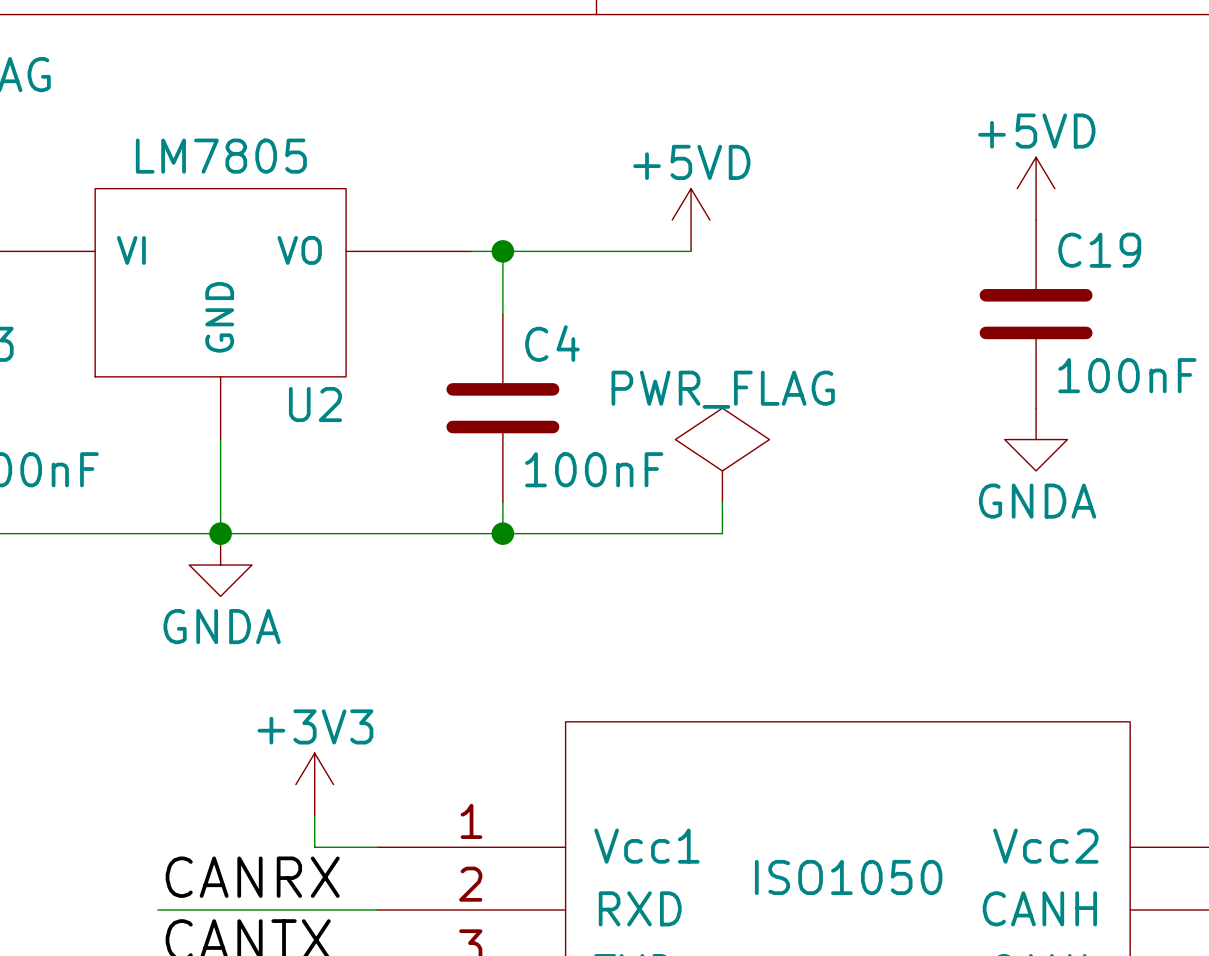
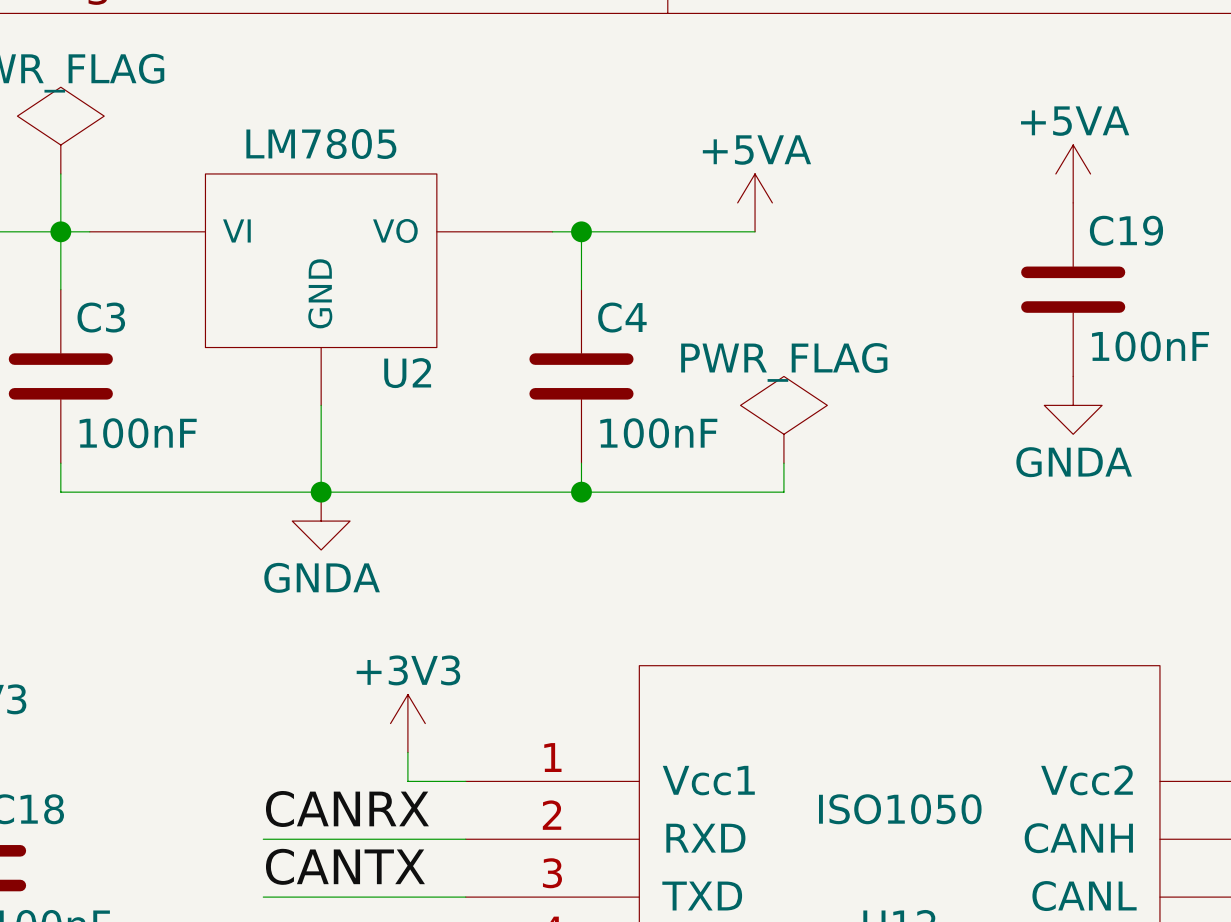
power symbol: +5VD (1036, 188) -> +5VA (1073, 173)
power symbol: +5VD (691, 220) -> +5VA (755, 202)

